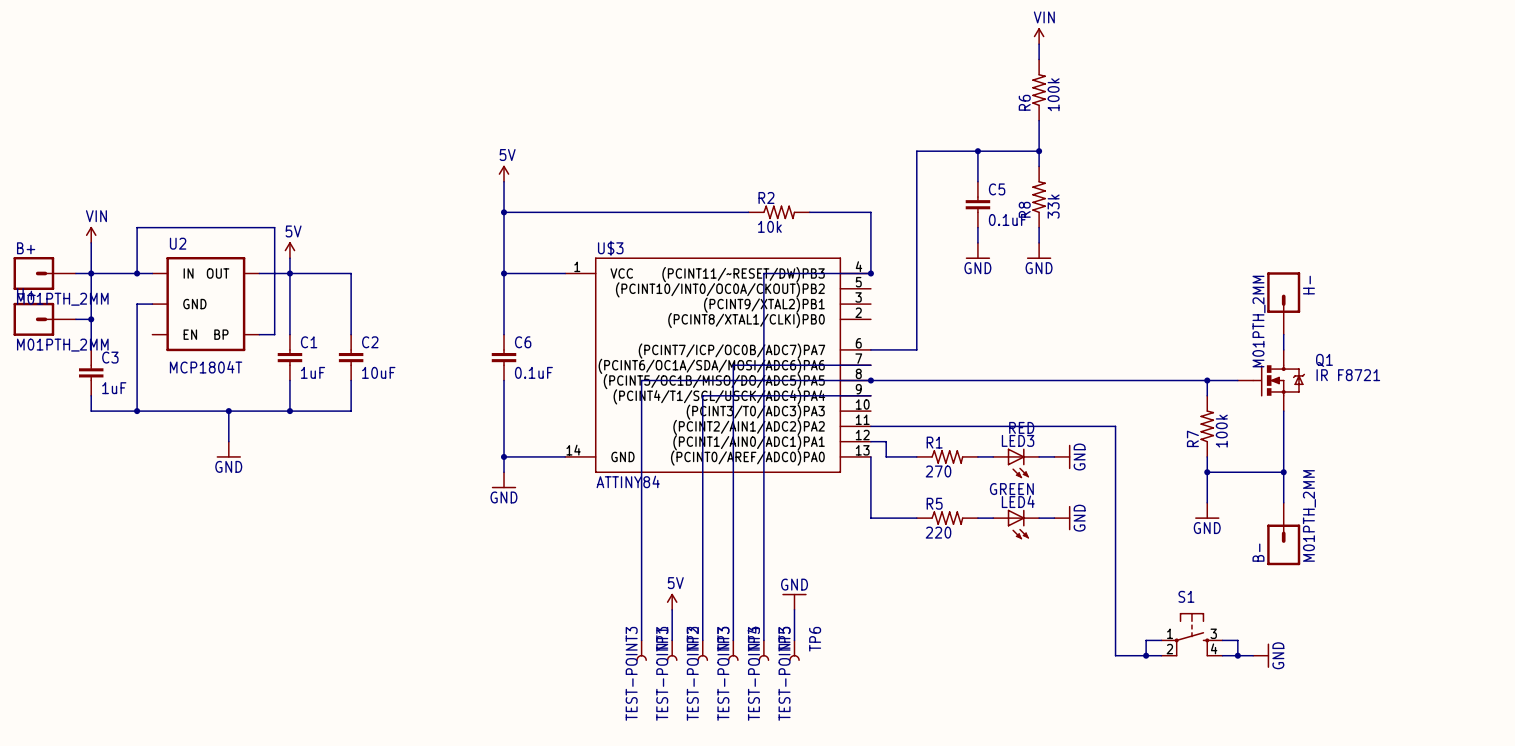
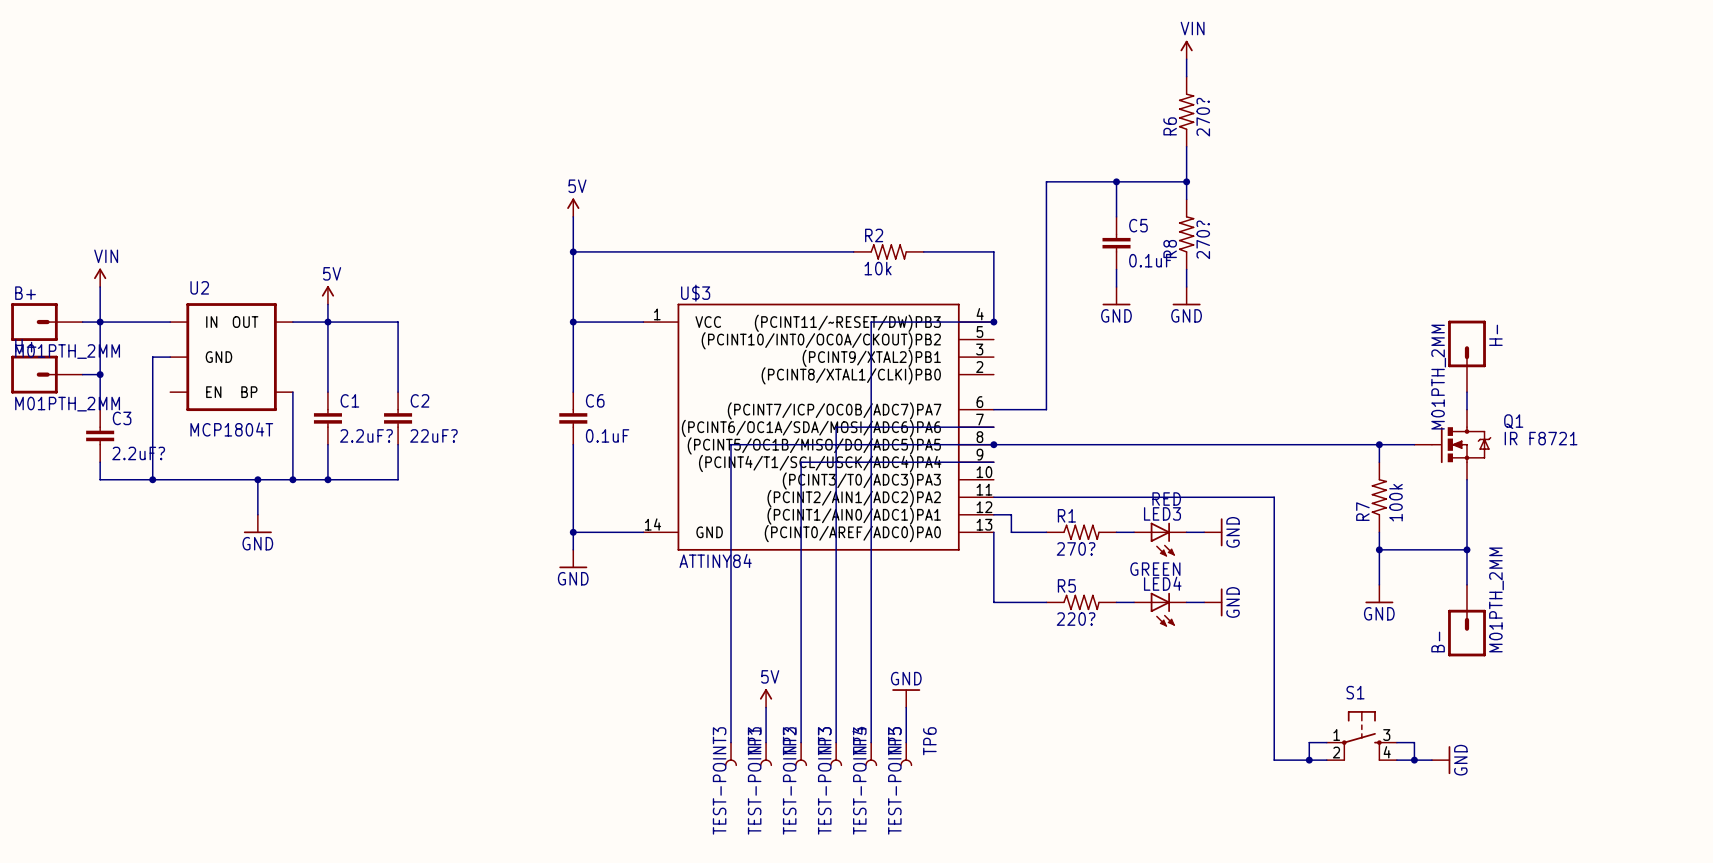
R6 value: 100k (1053, 94) -> 270? (1203, 117)
R8 value: 33k (1053, 206) -> 270? (1203, 239)
wire: (137, 273) (137, 227) (274, 227) (274, 334) (259, 334) -> (292, 479) (292, 392)
junction: (137, 273) -> none
C1 value: 1uF (313, 372) -> 2.2uF? (366, 435)
C2 value: 10uF (378, 372) -> 22uF? (433, 435)
C3 value: 1uF (114, 388) -> 2.2uF? (138, 453)
junction: none -> (292, 479)
R1 value: 270 (938, 471) -> 270? (1076, 548)
R5 value: 220 (938, 532) -> 220? (1076, 619)

